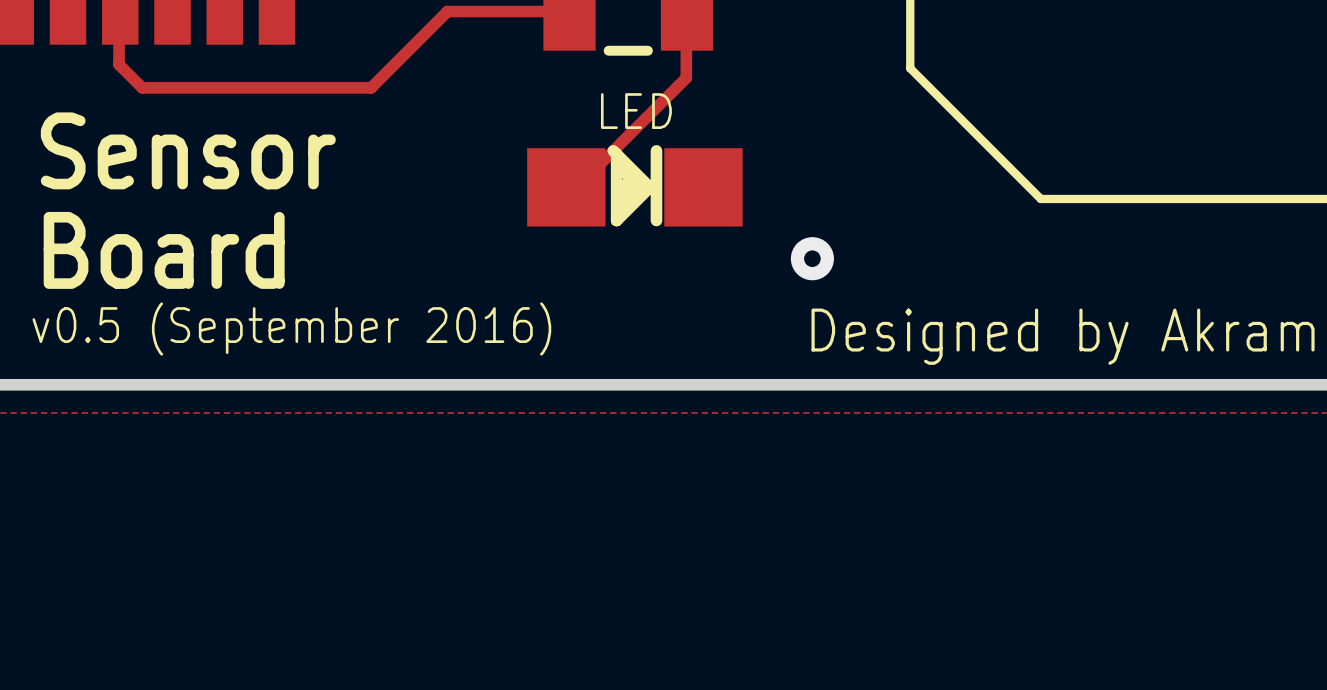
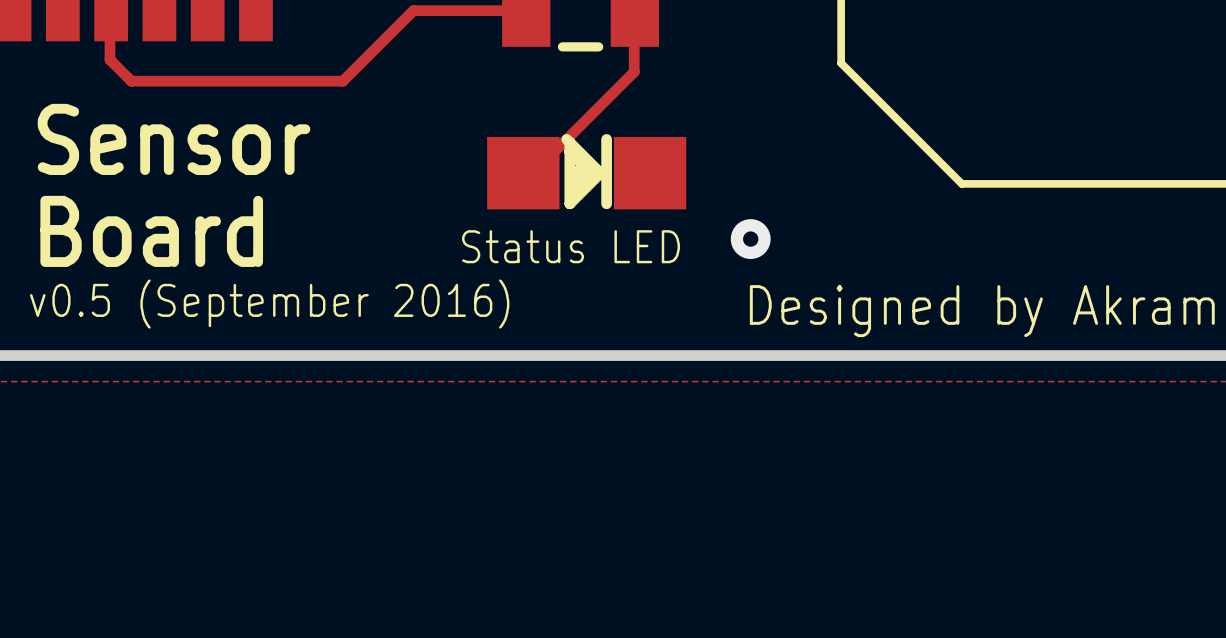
text: LED (636, 111) -> none
text: none -> Status LED (571, 246)

